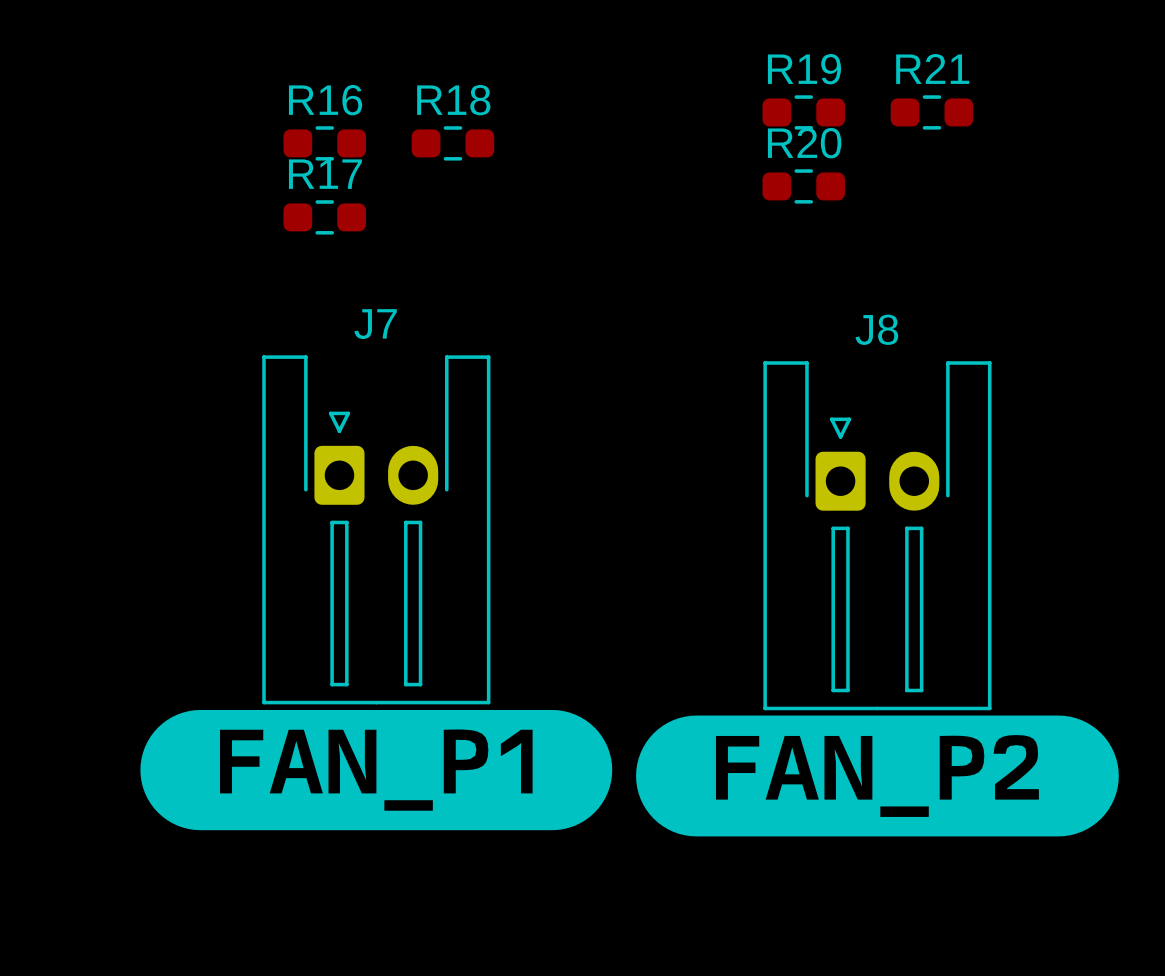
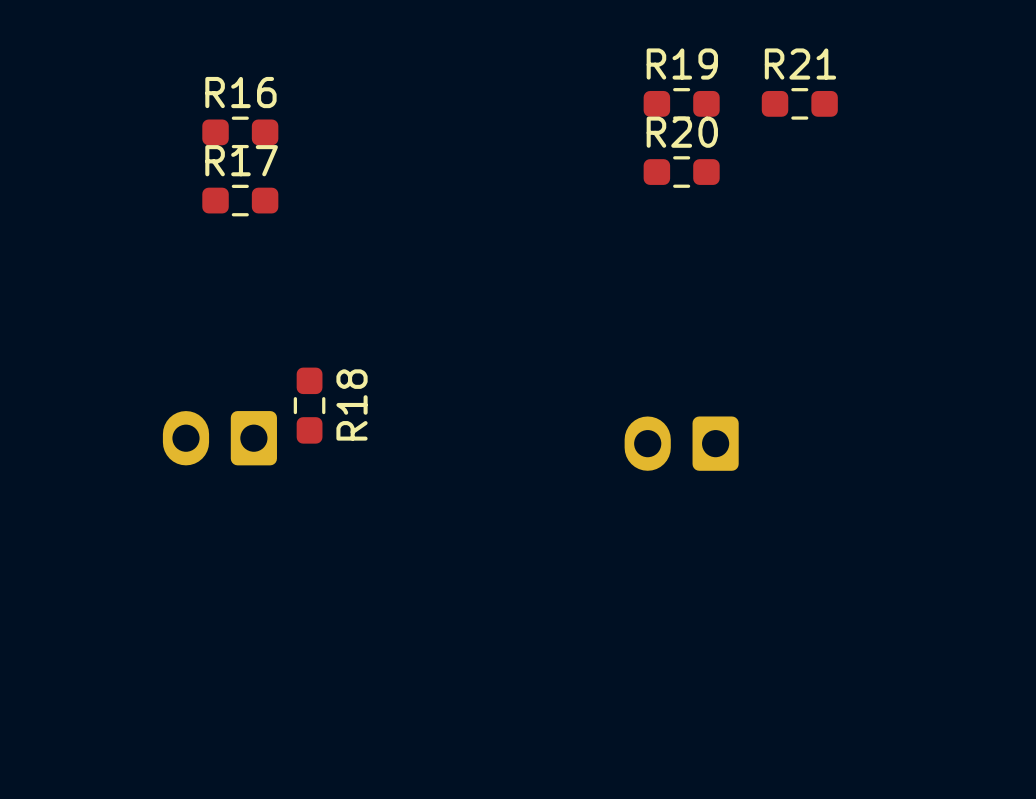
R18 rotation: 0° (452, 143) -> 90° clockwise (309, 405)
R18 position: (452, 143) -> (309, 405)
J7 side: top (376, 529) -> bottom (219, 438)
J8 side: top (877, 535) -> bottom (681, 443)
drawing: [140, 709, 1119, 837] -> none

